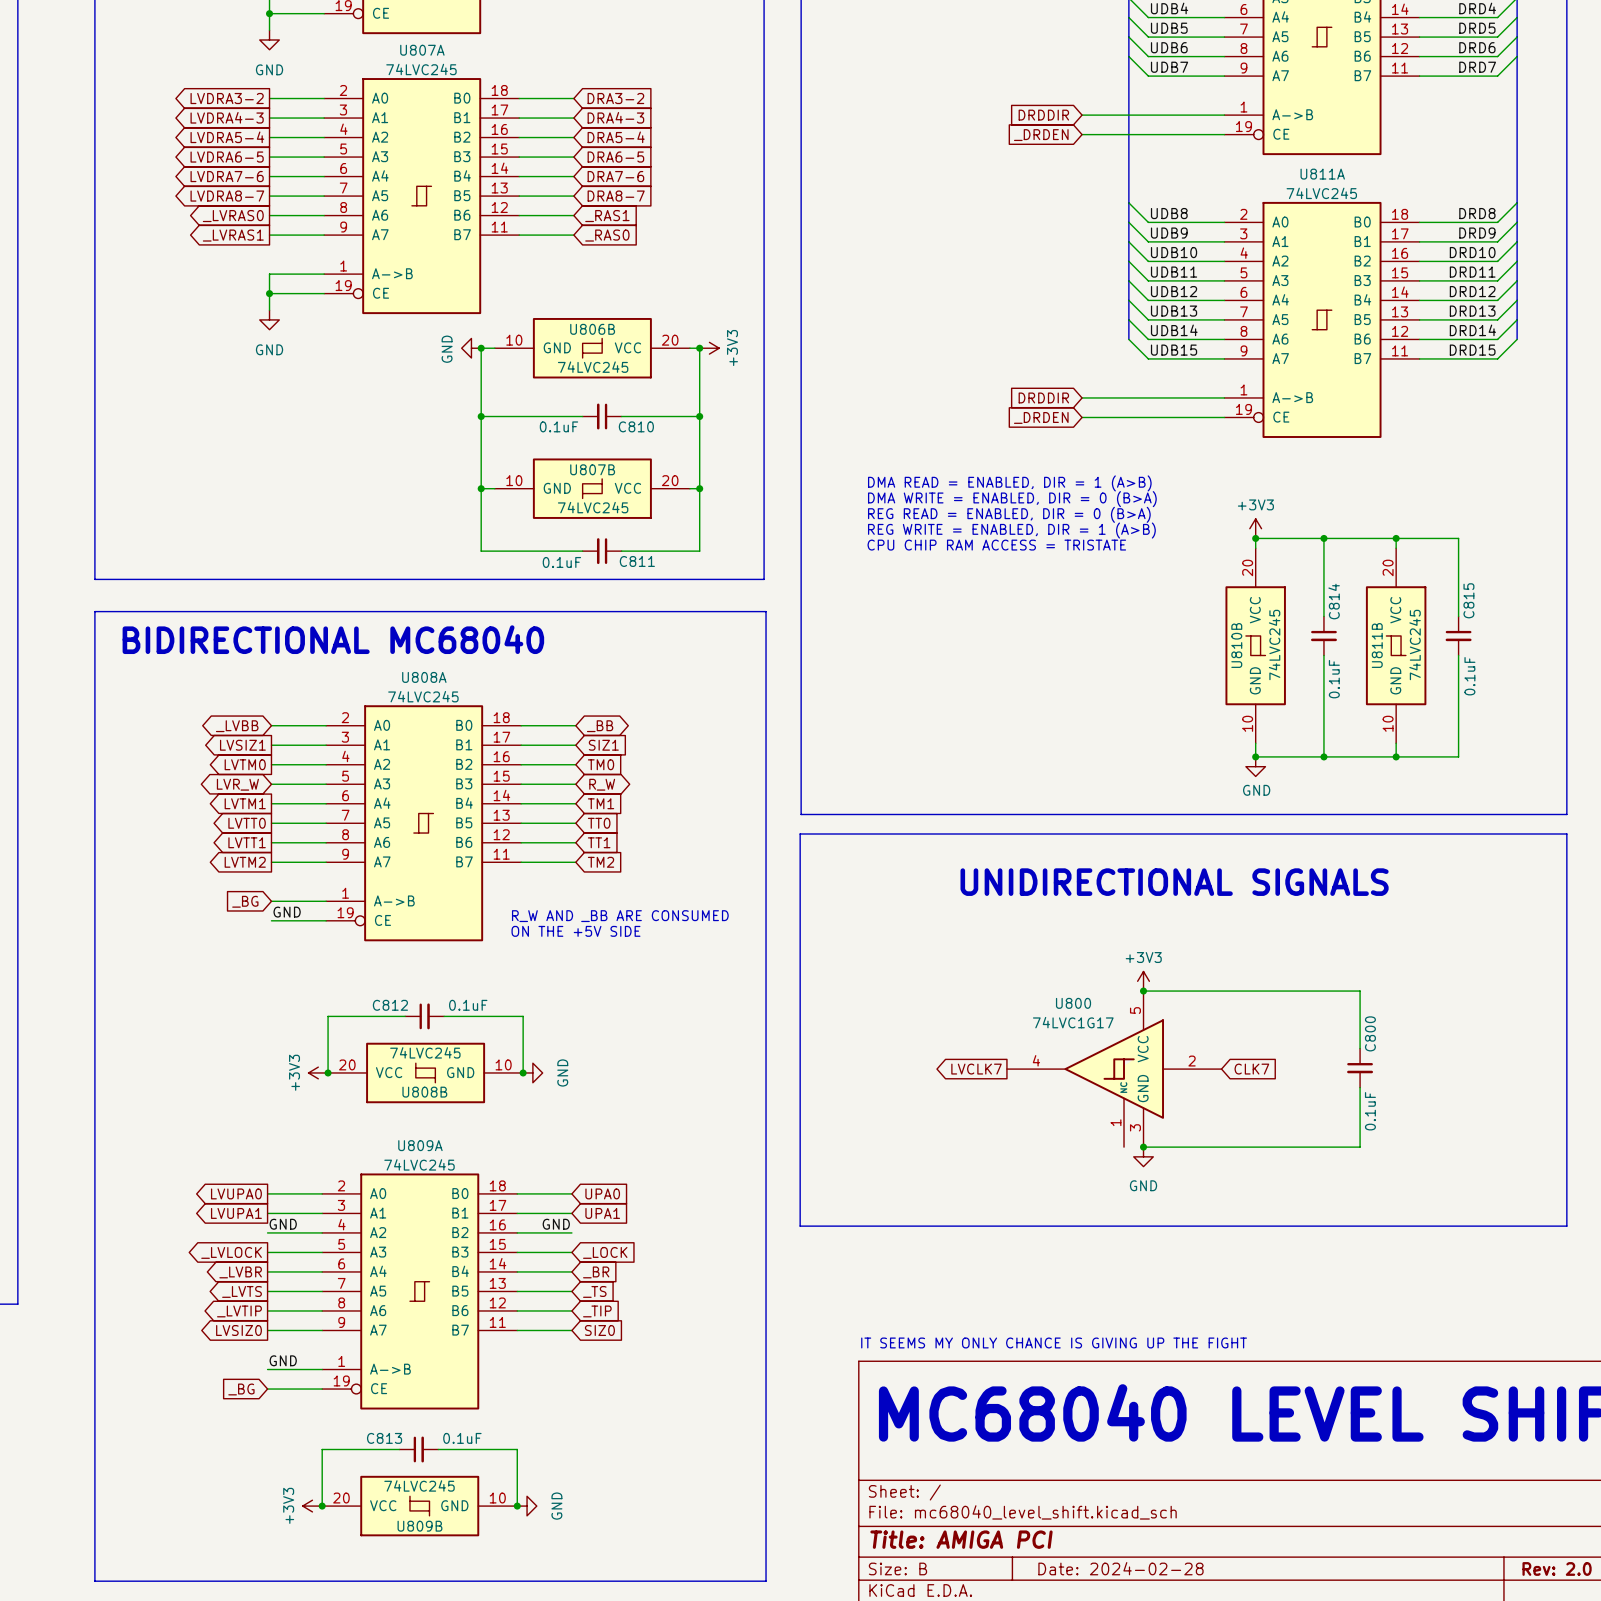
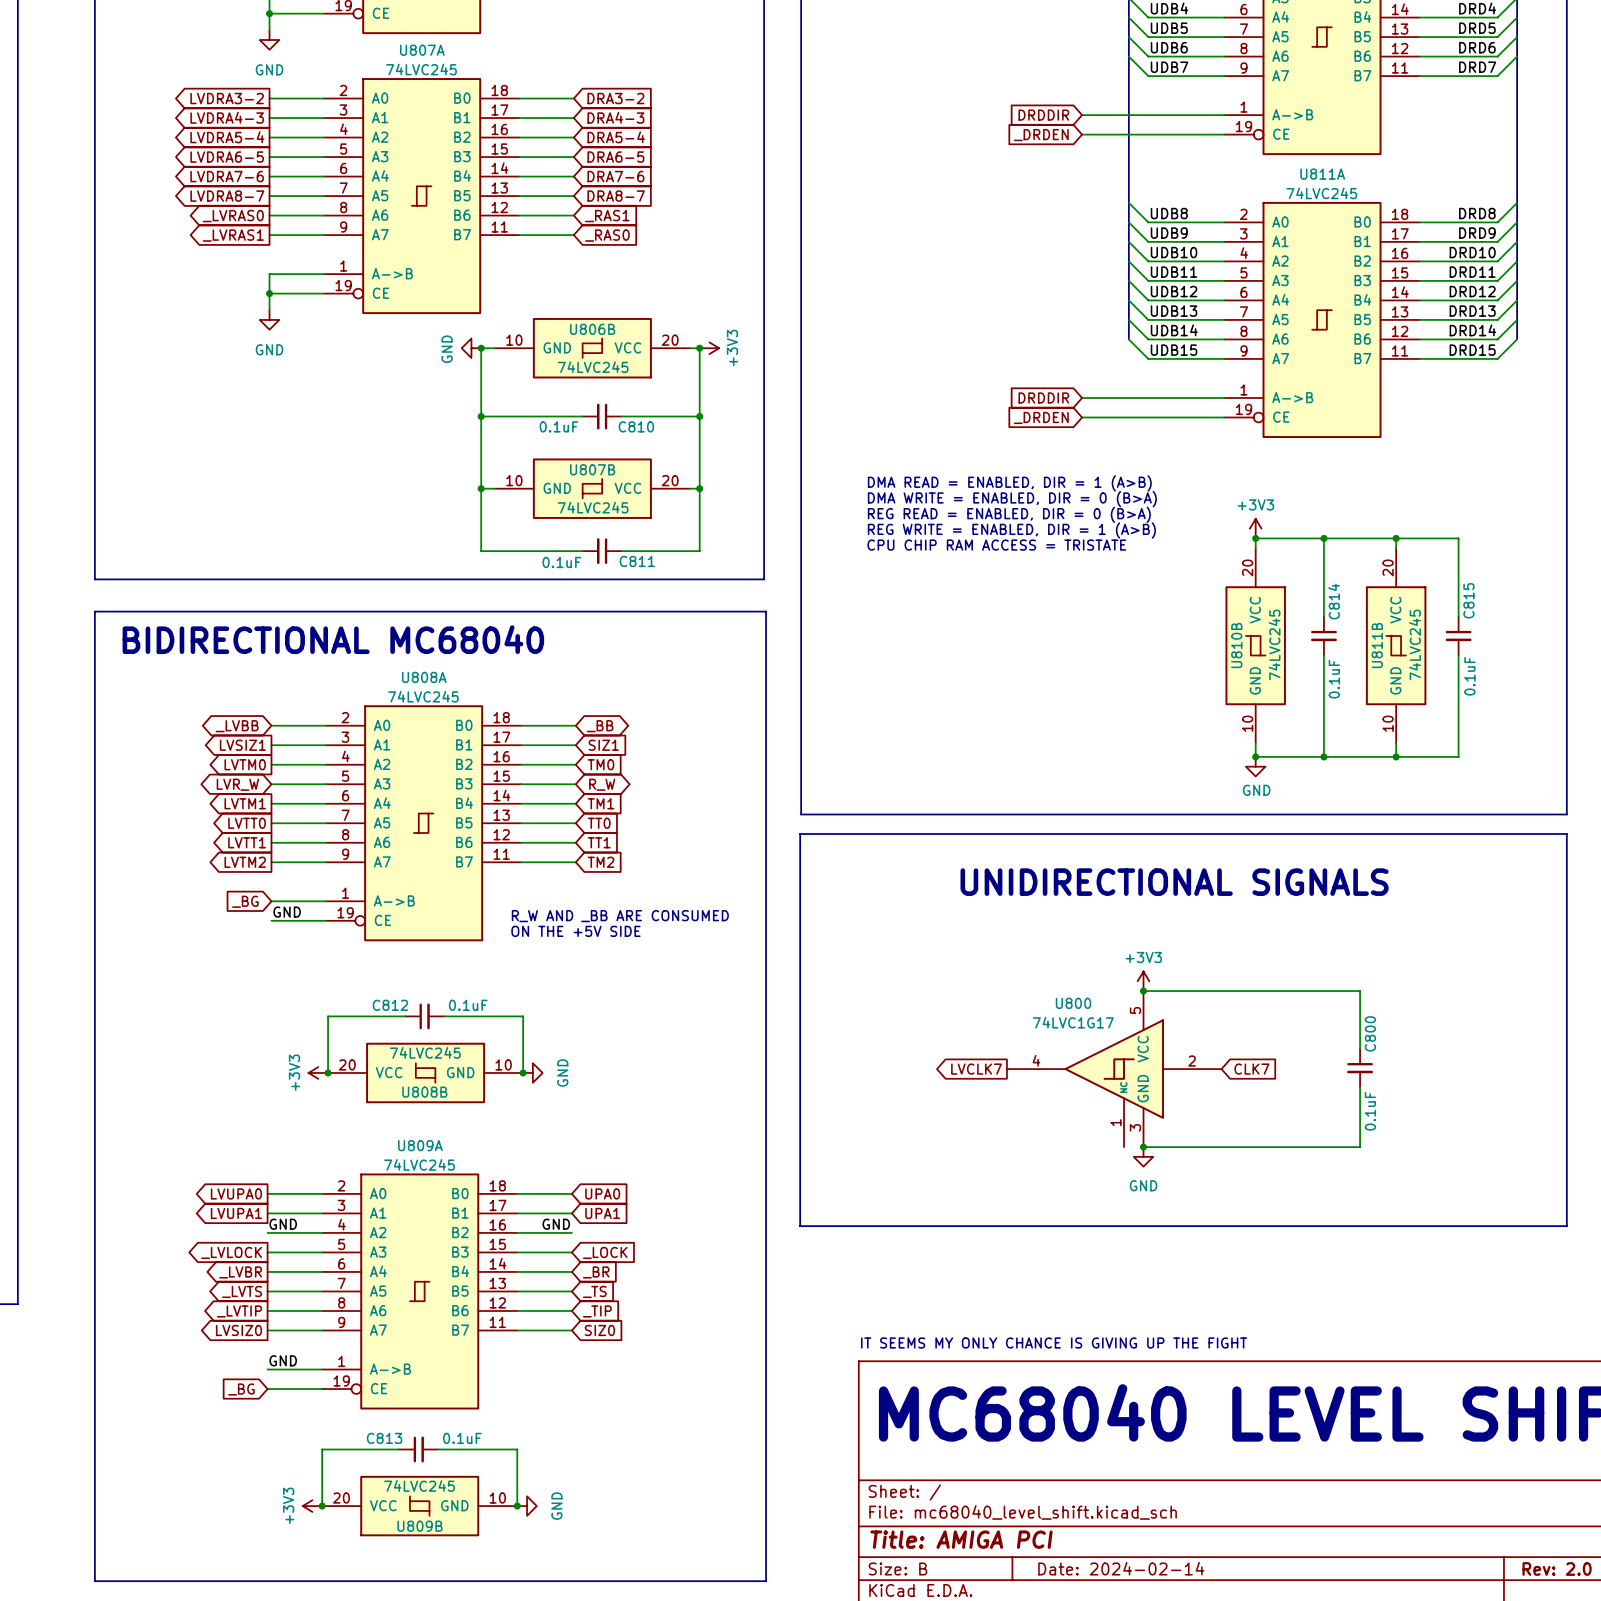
title block: Date: 2024-02-28 (1120, 1568) -> Date: 2024-02-14 (1121, 1568)

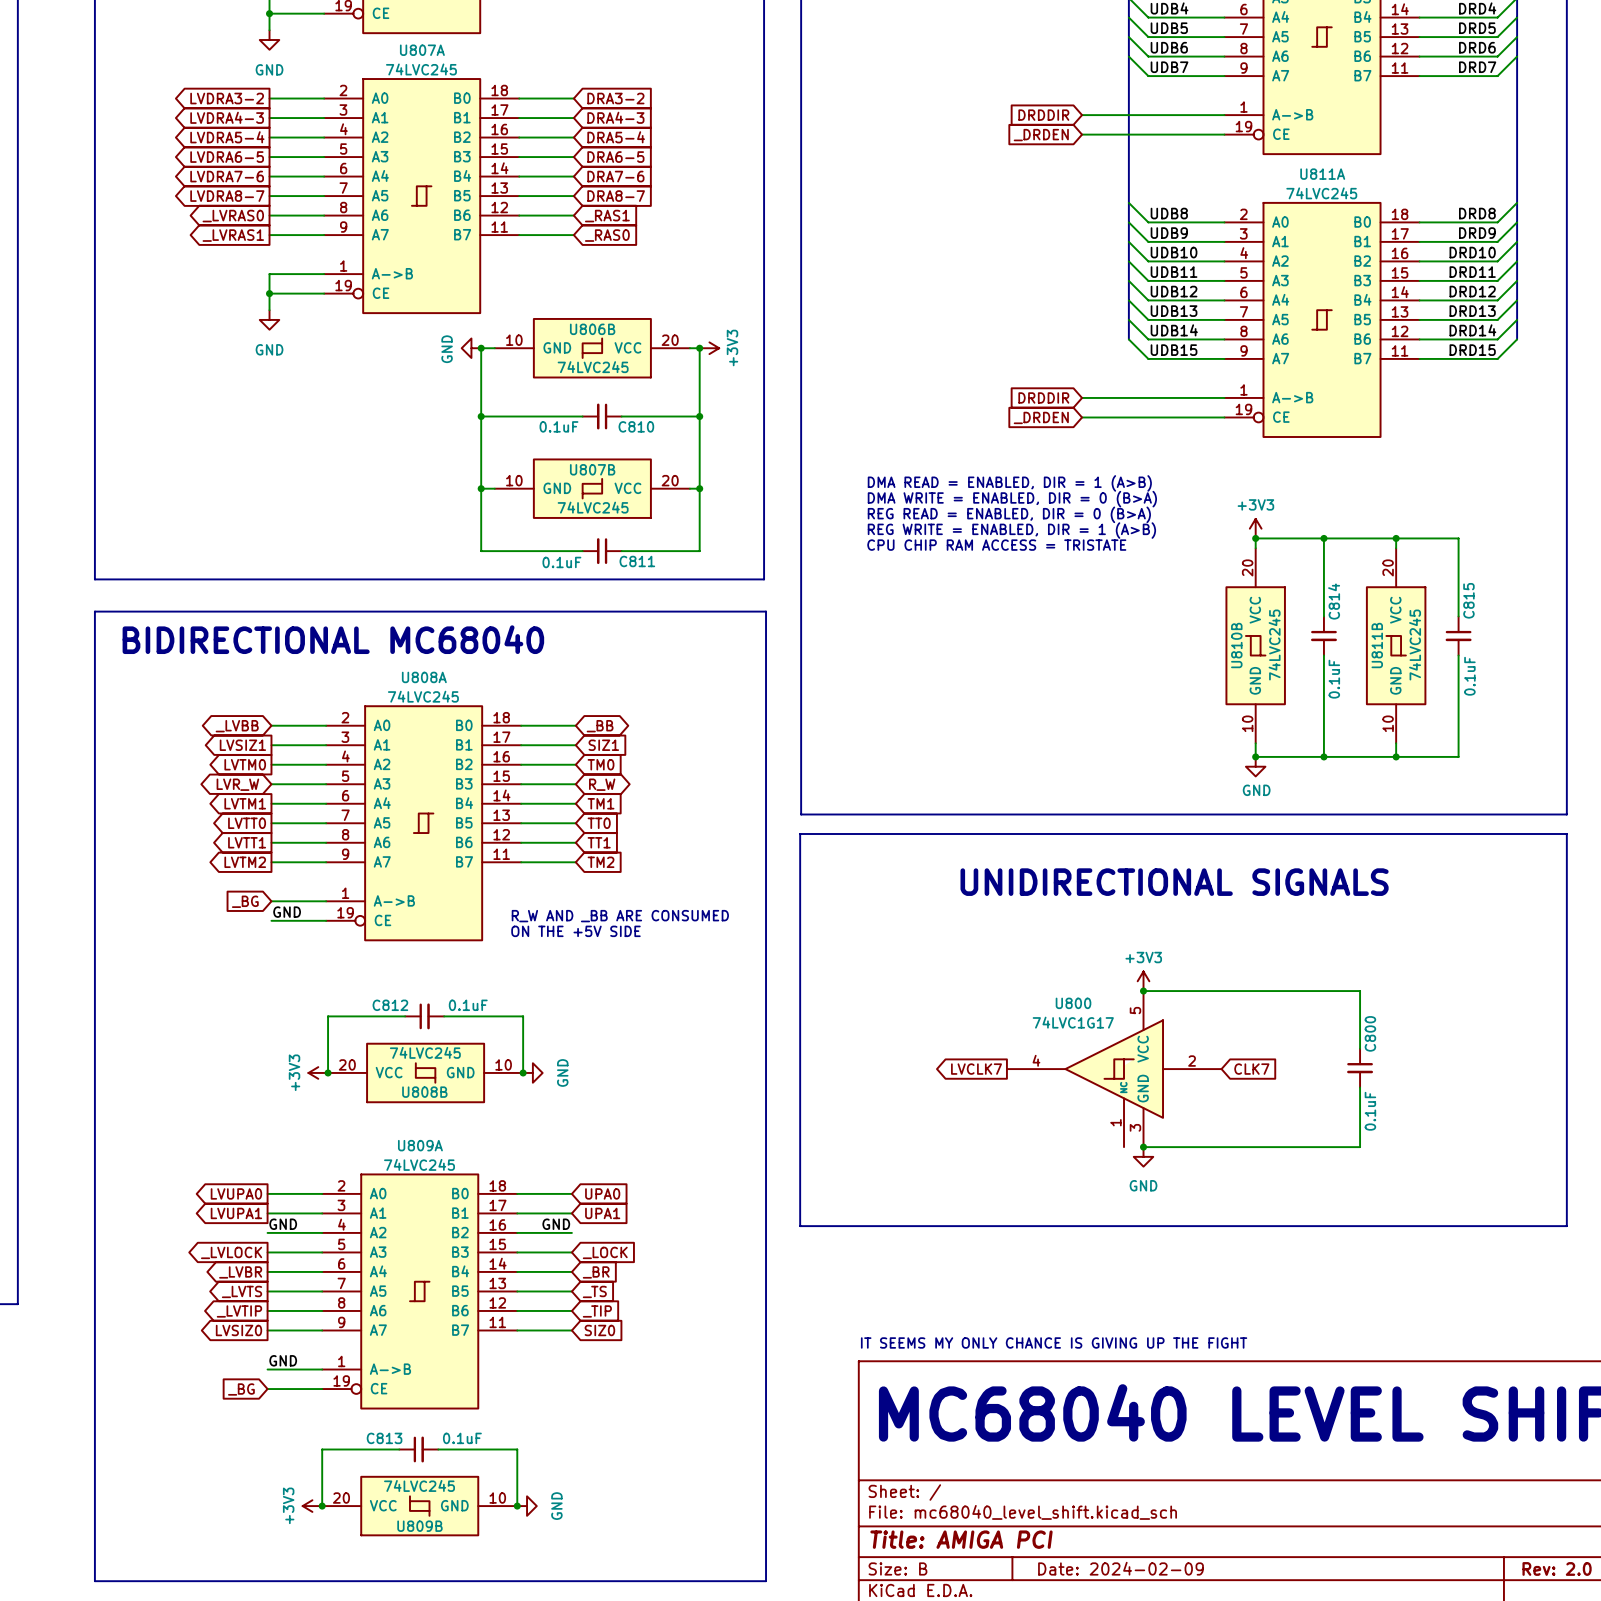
title block: Date: 2024-02-14 (1121, 1568) -> Date: 2024-02-09 (1120, 1568)

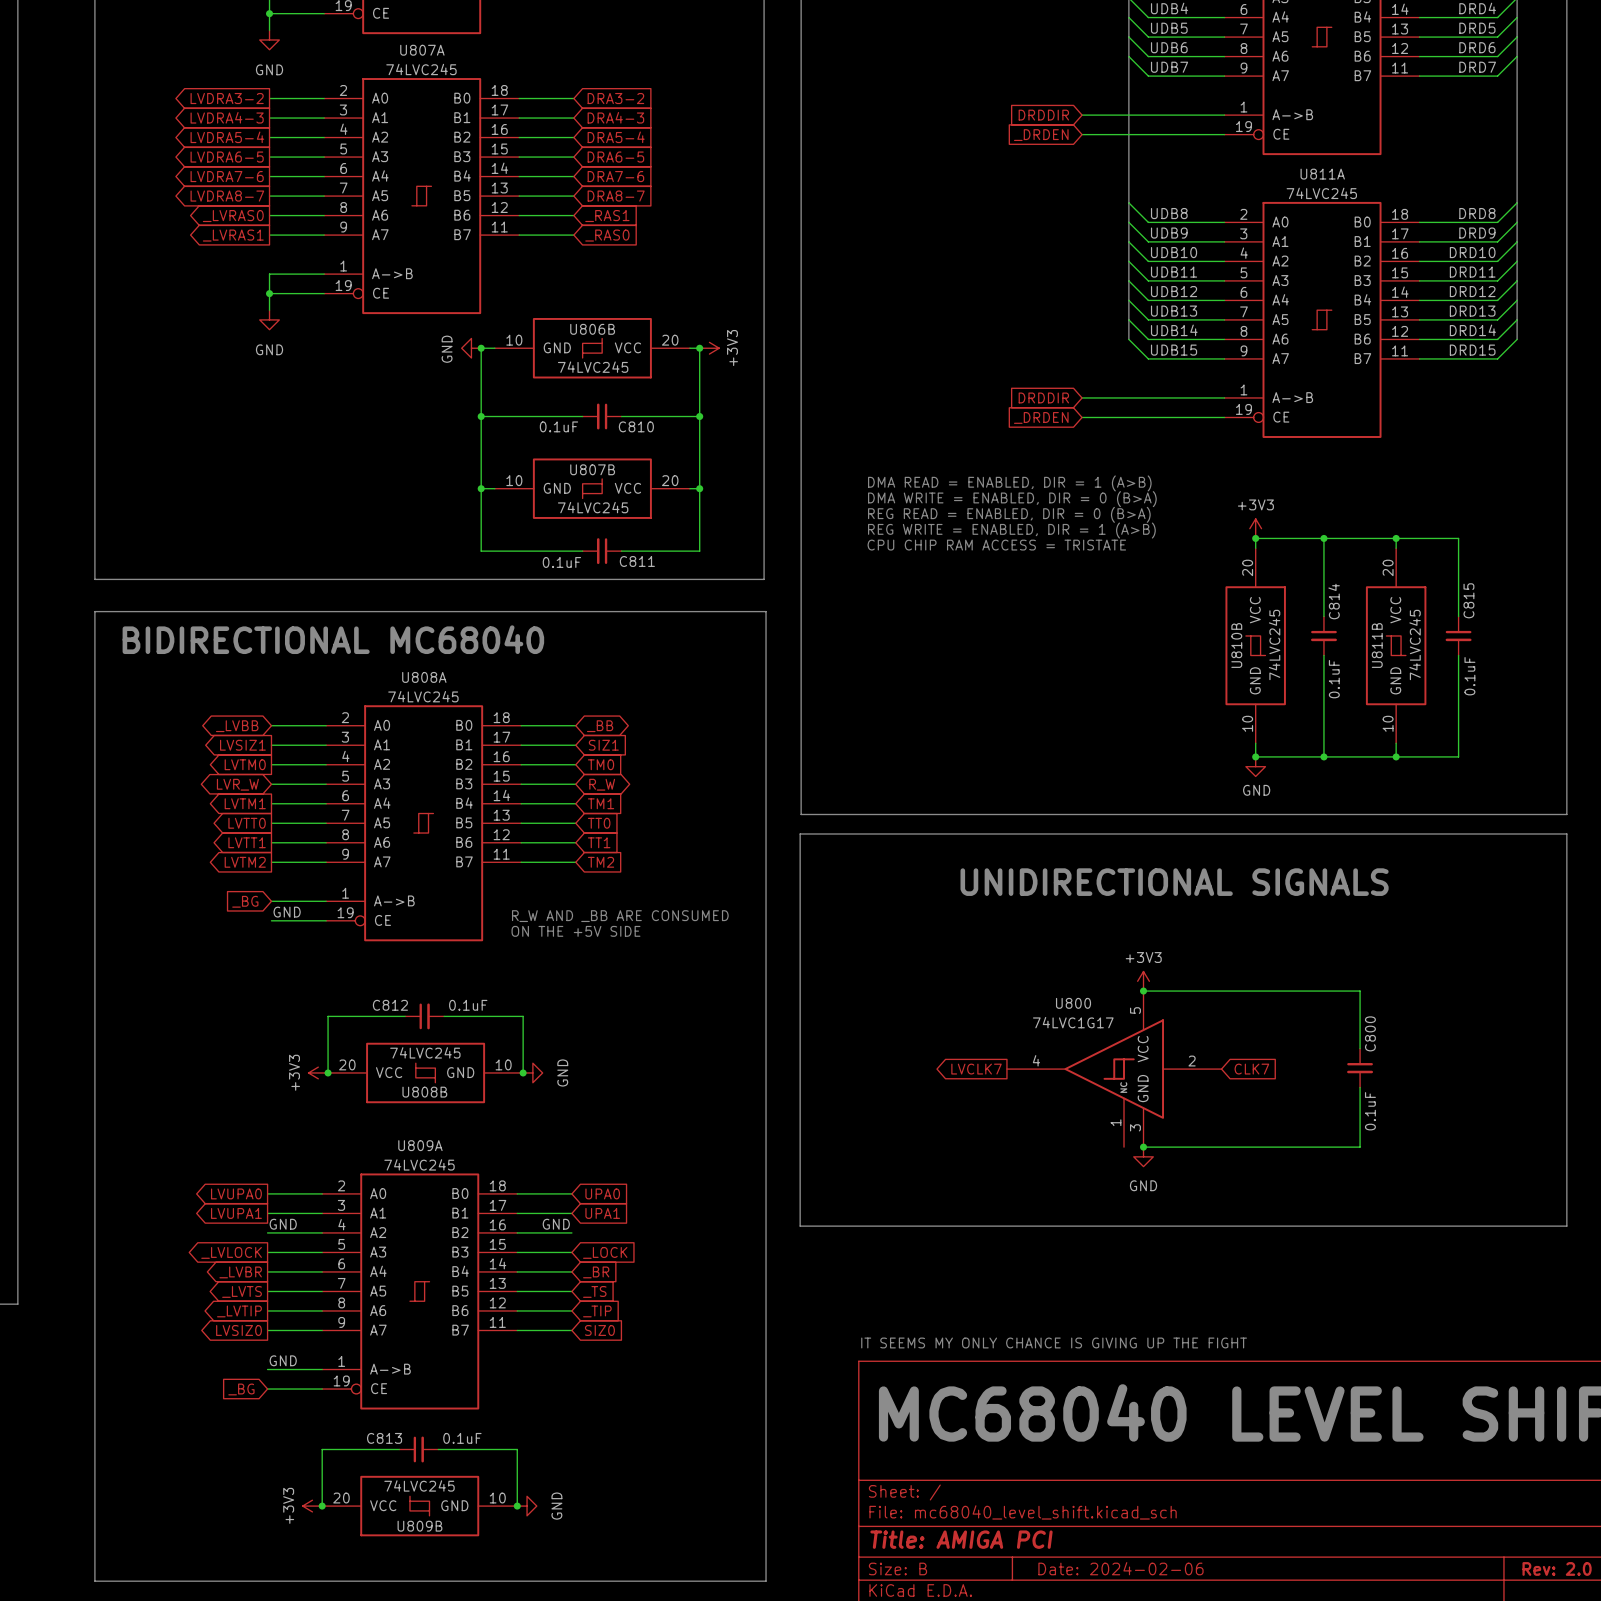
title block: Date: 2024-02-09 (1120, 1568) -> Date: 2024-02-06 (1120, 1568)

